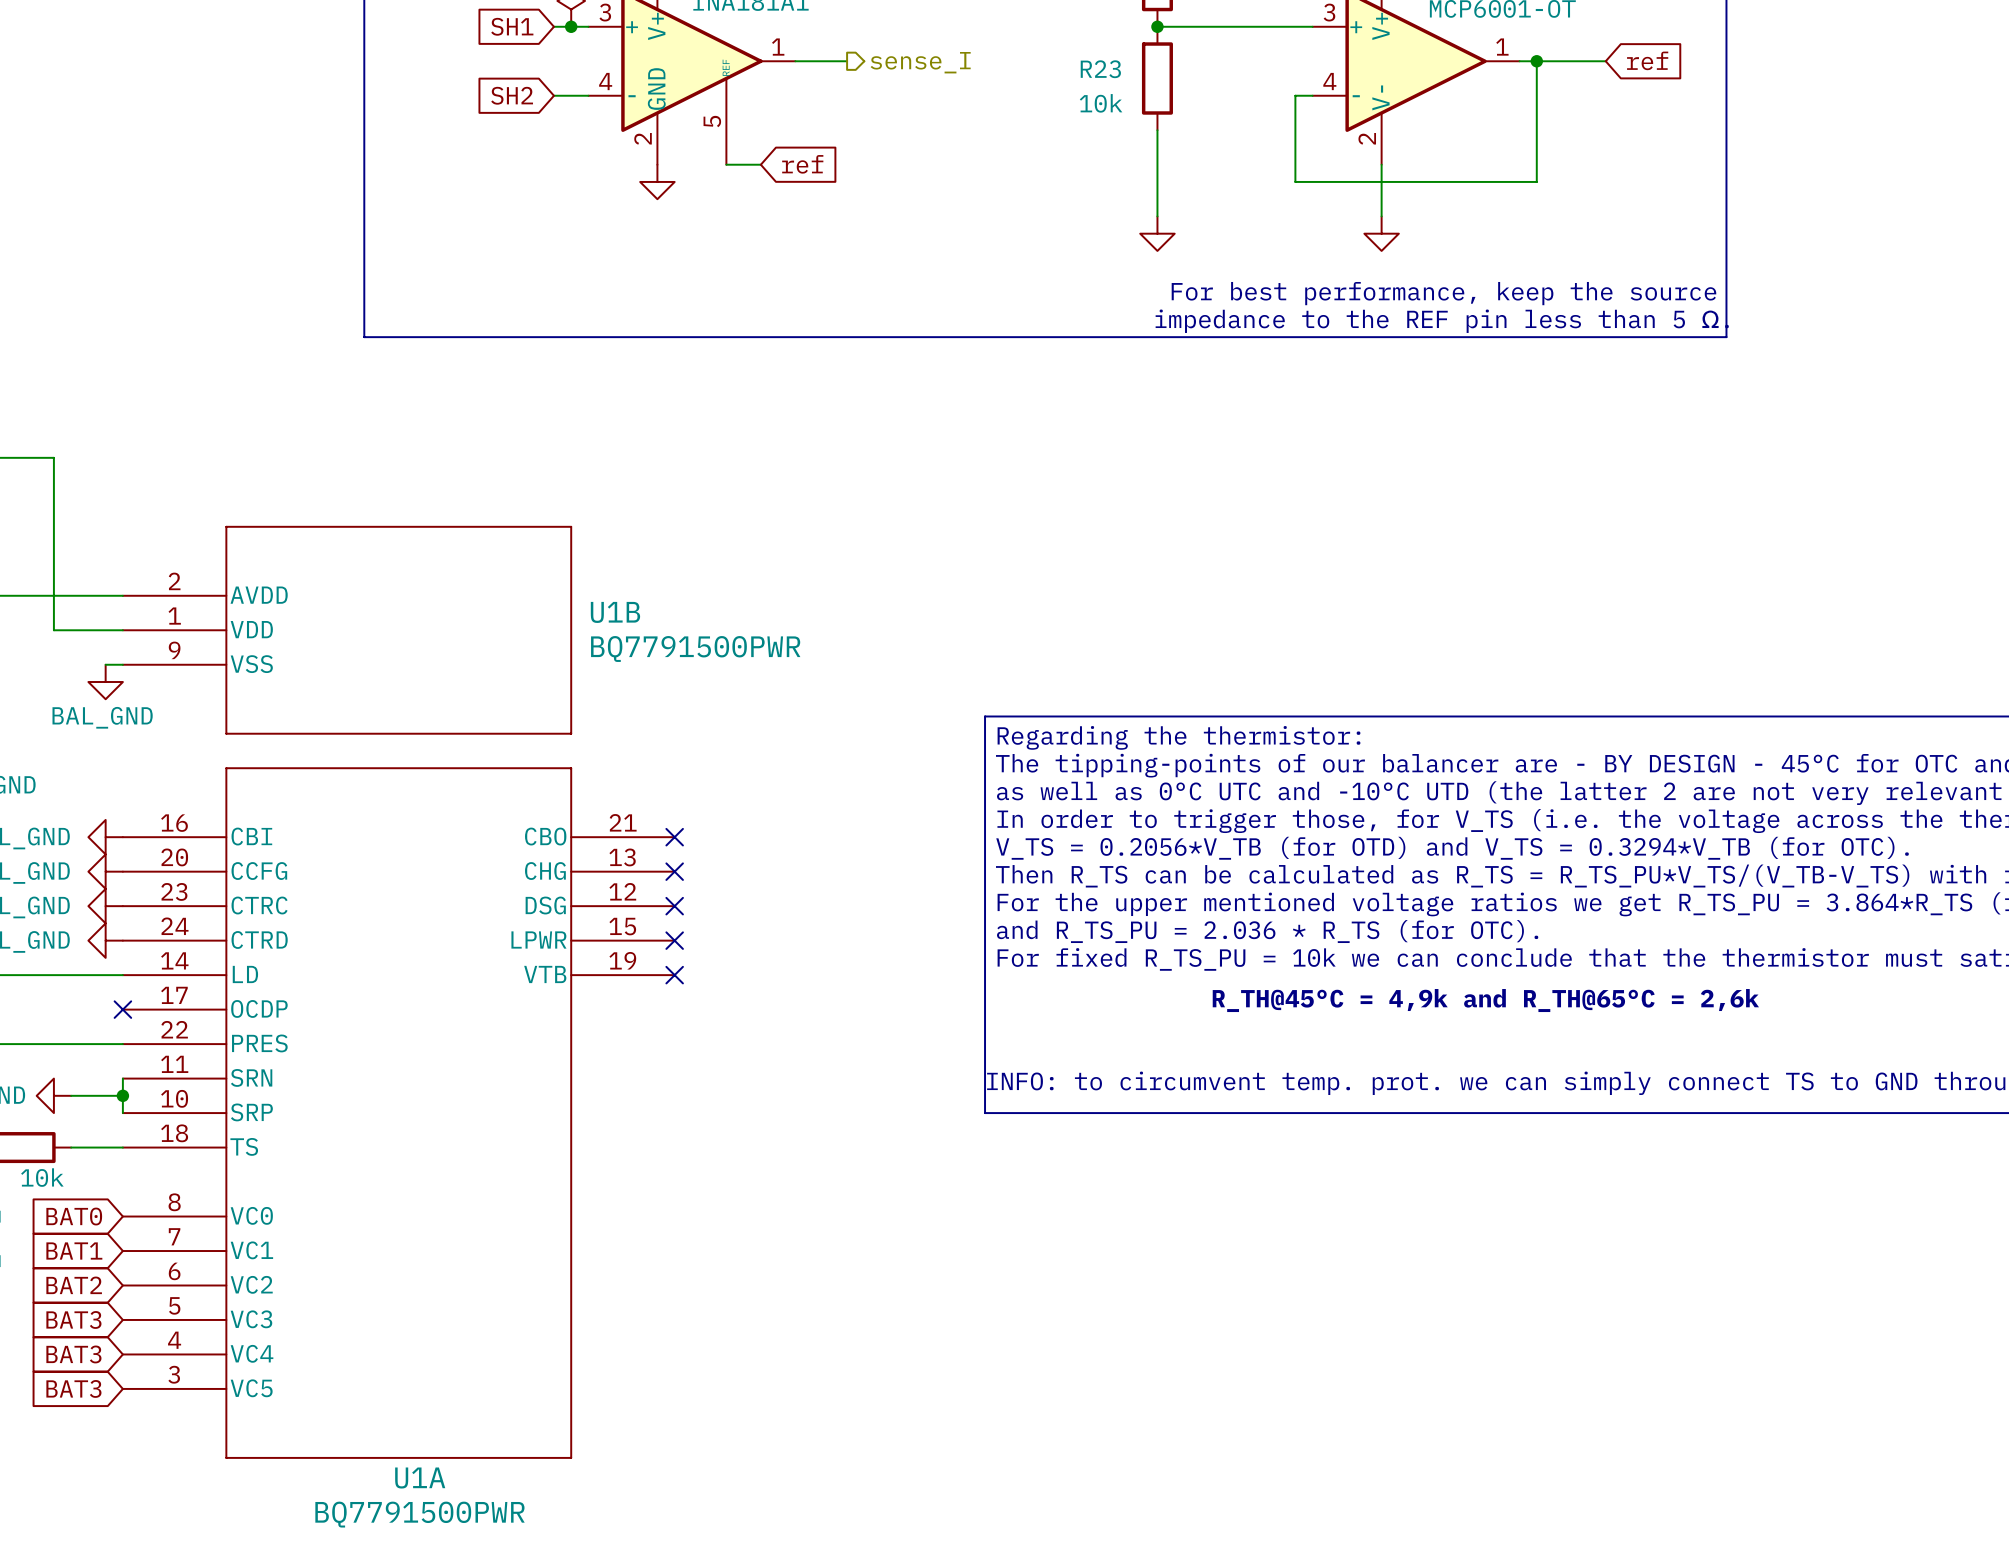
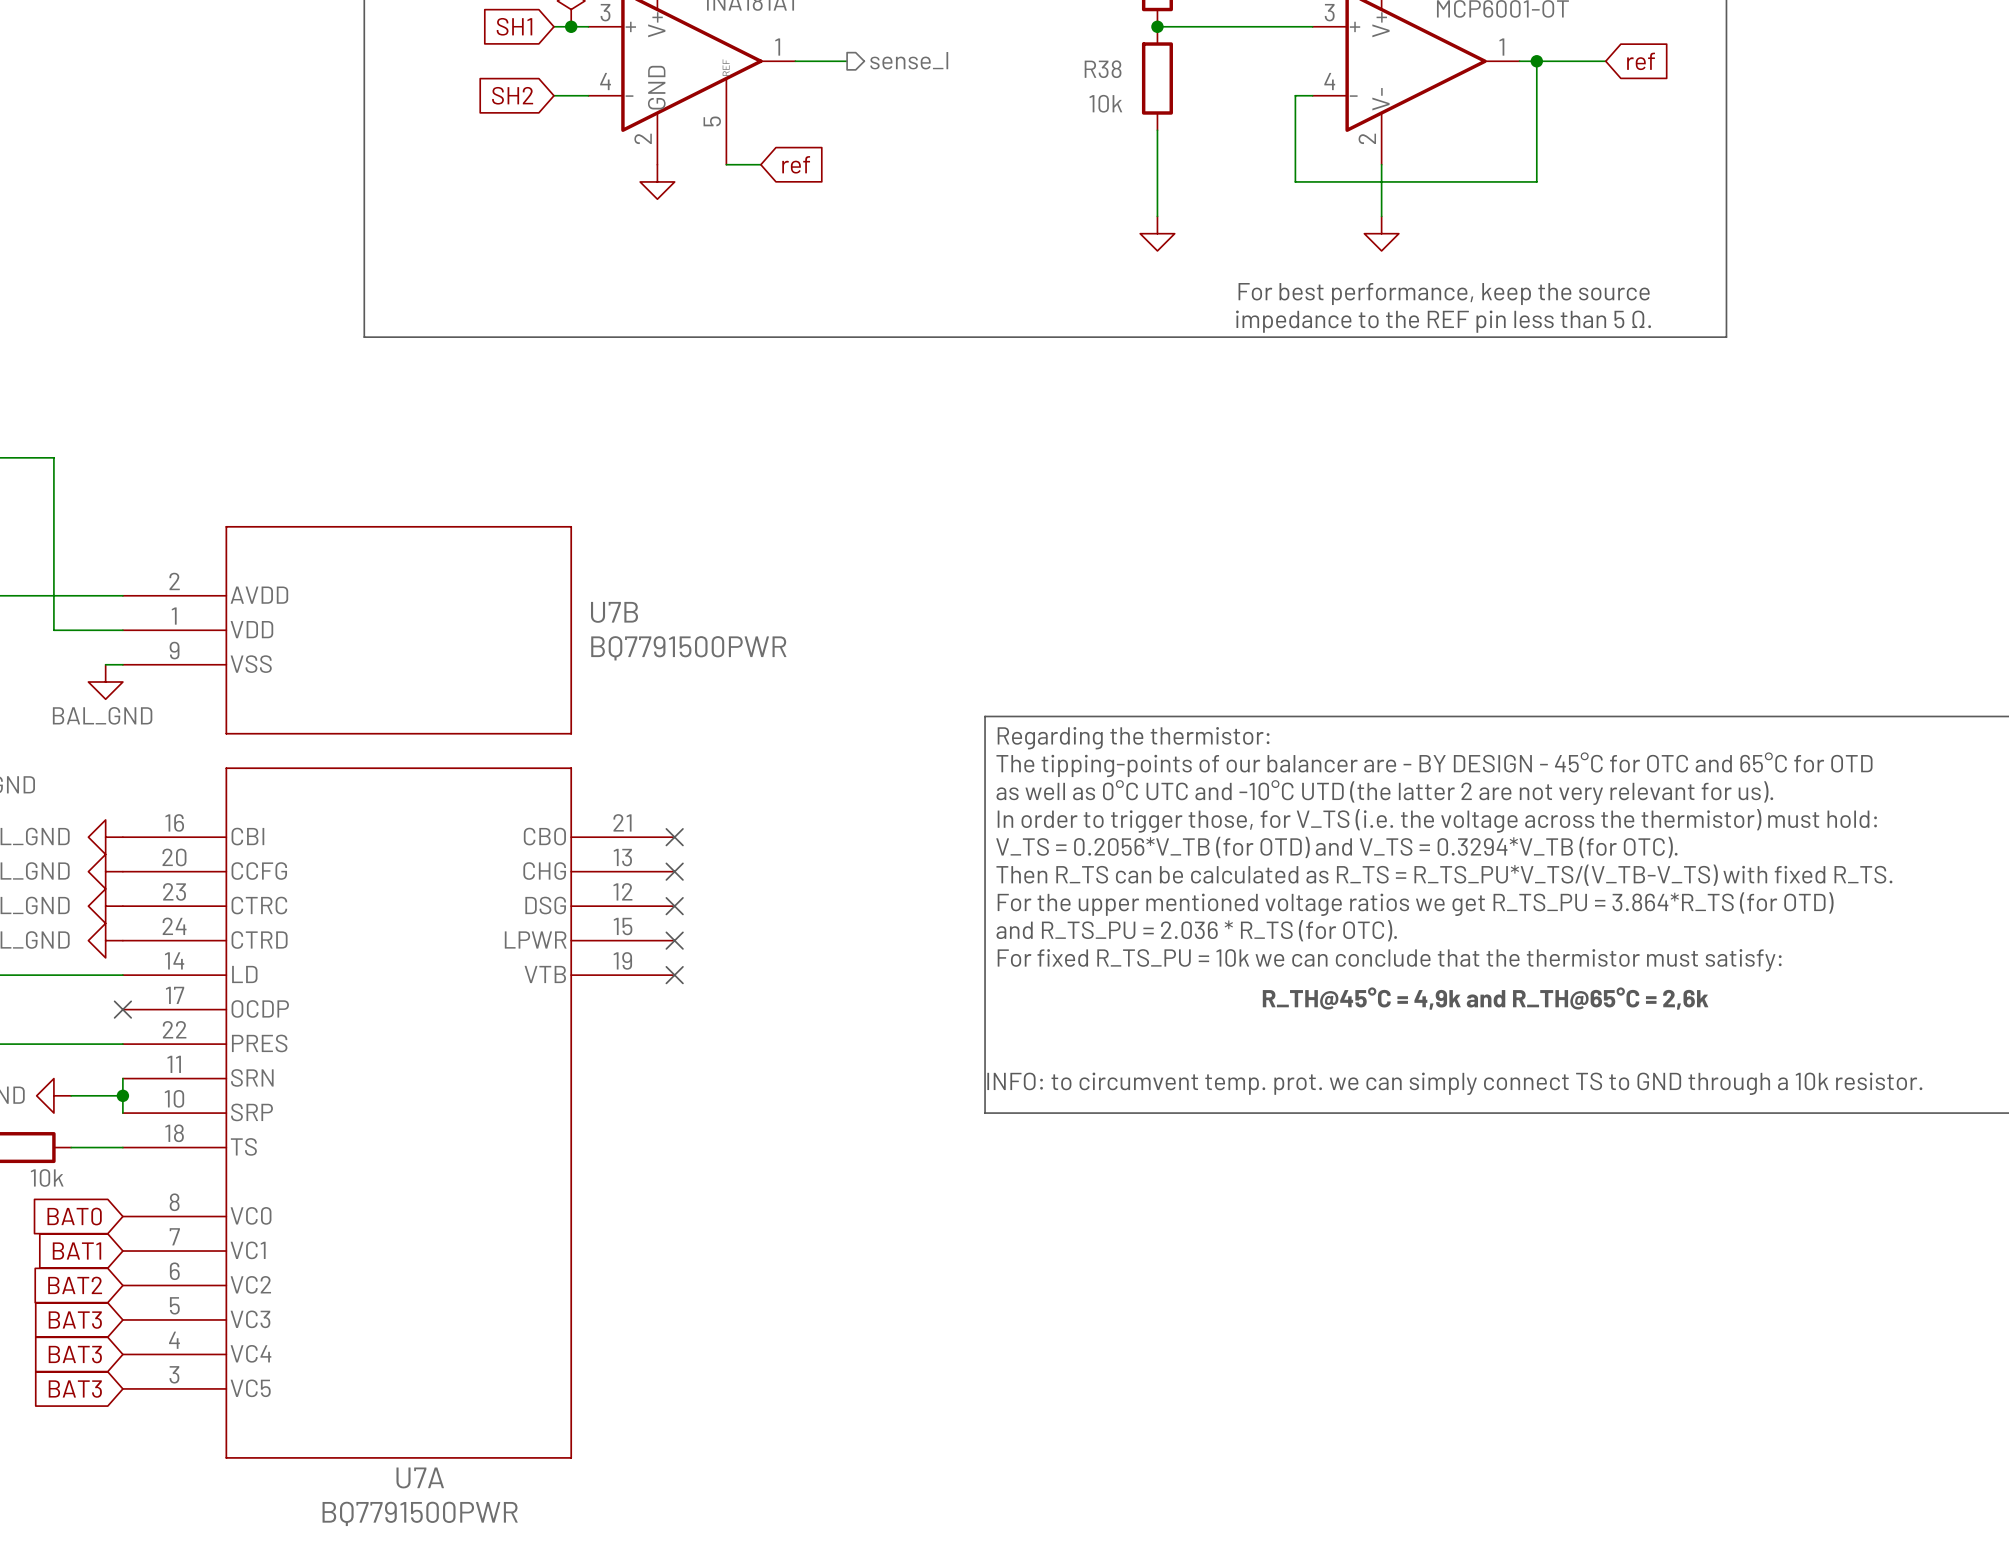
R23 name: R23 (1100, 69) -> R38 (1103, 69)
U1B name: U1B (615, 612) -> U7B (614, 612)
U1A name: U1A (420, 1478) -> U7A (420, 1477)

